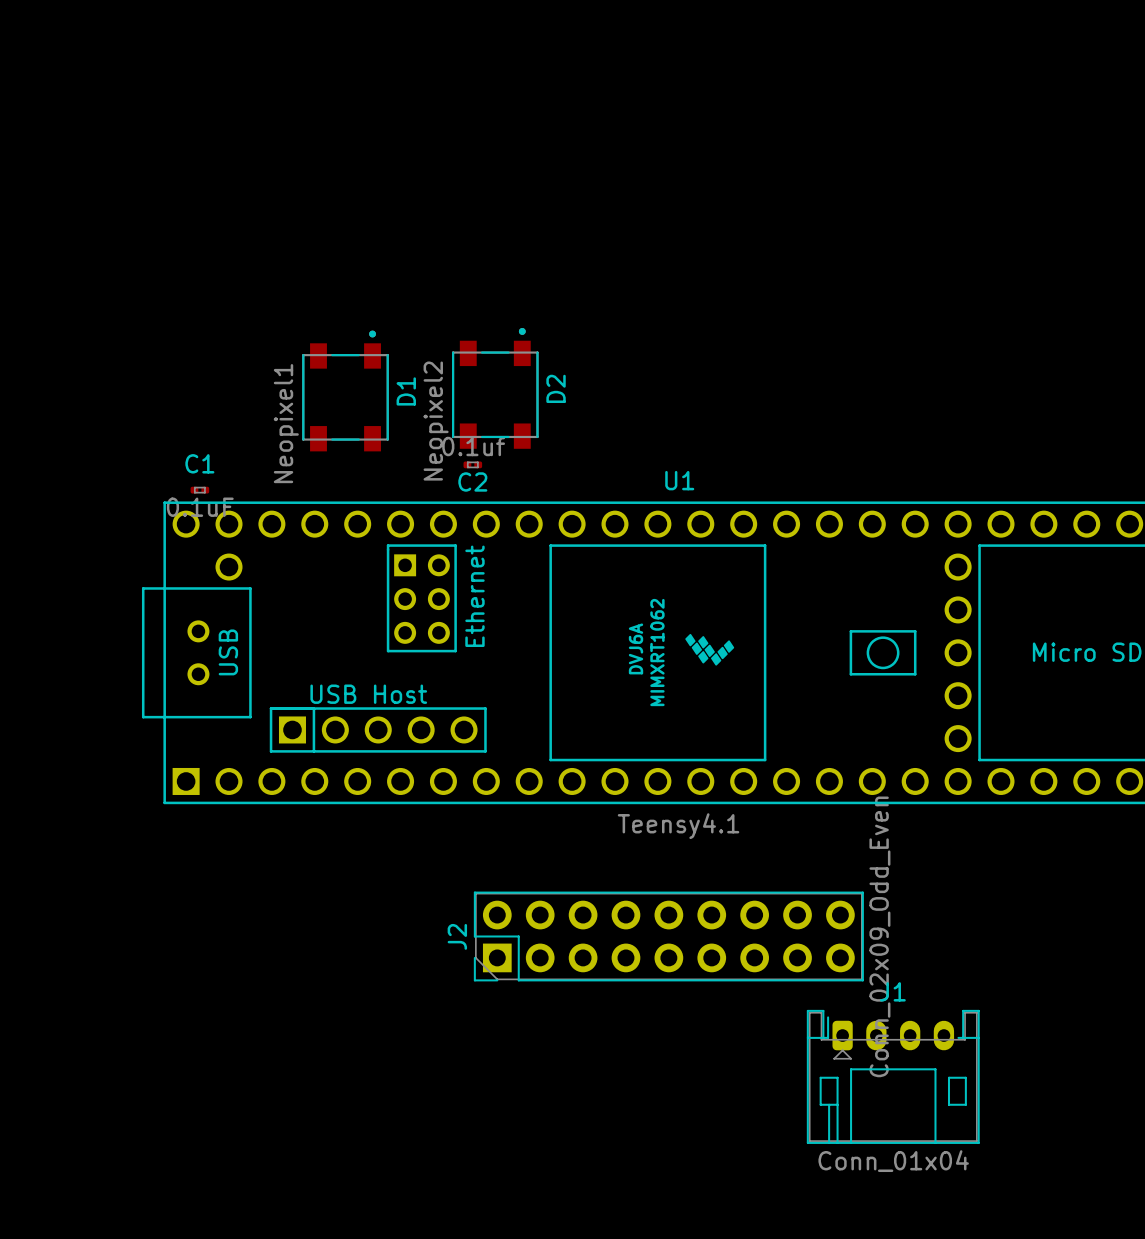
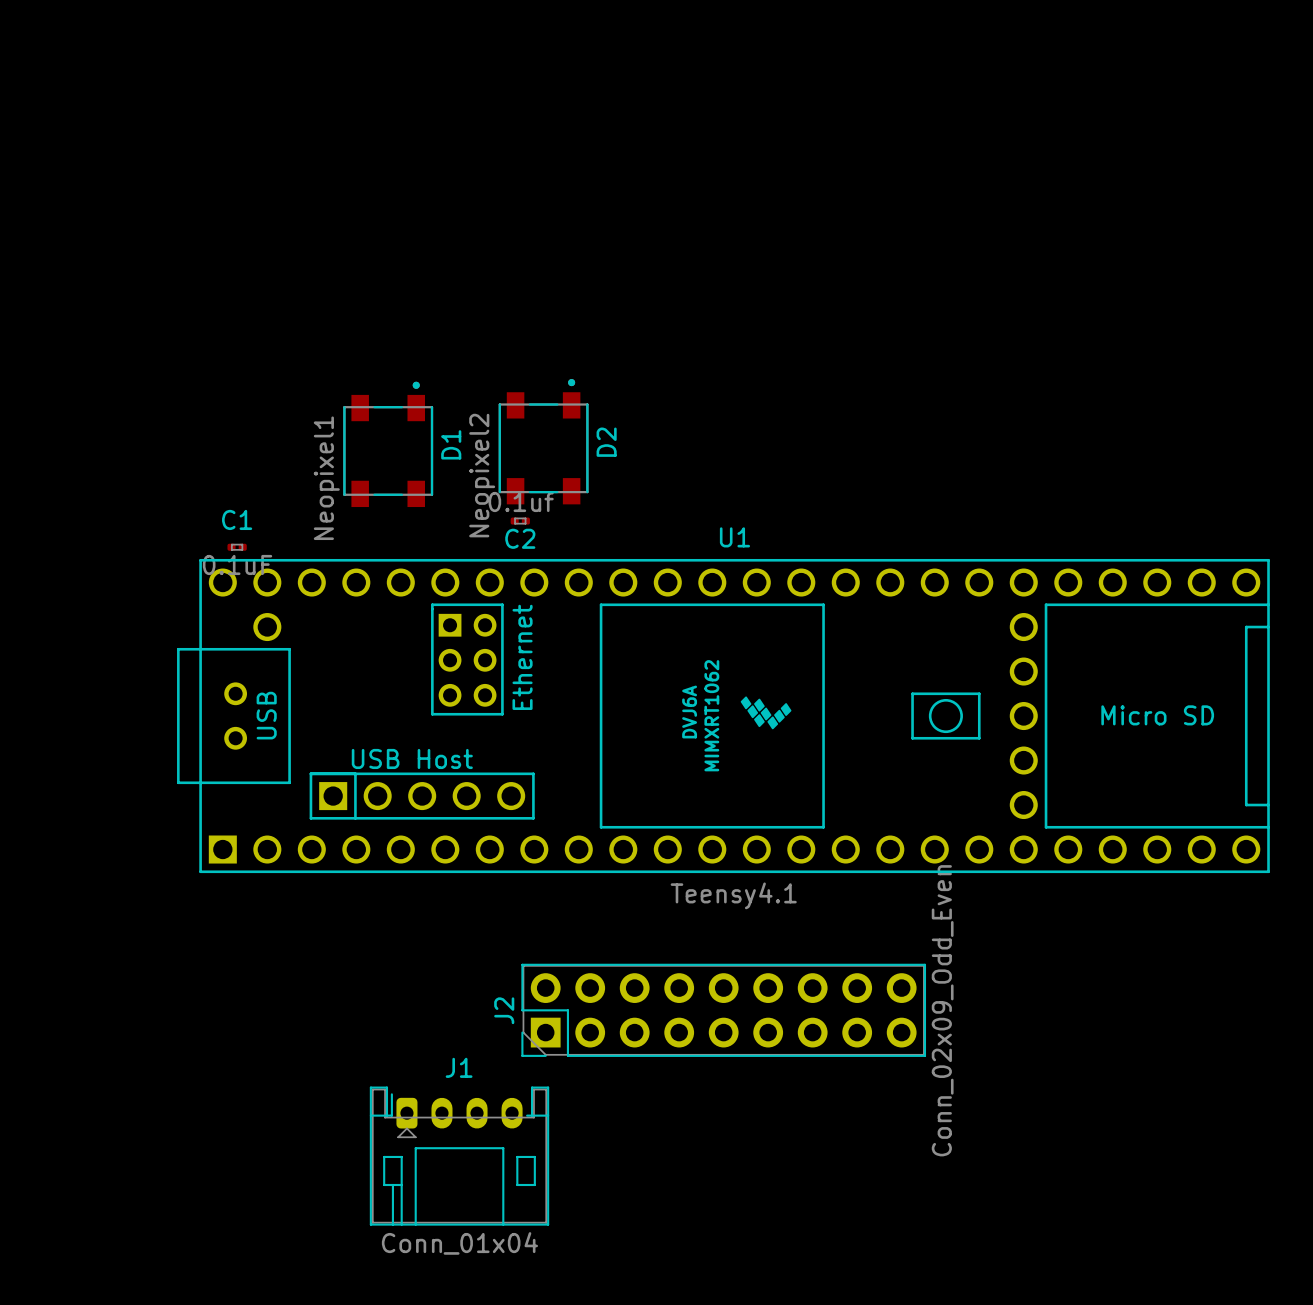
J1 position: (893, 1076) -> (459, 1156)

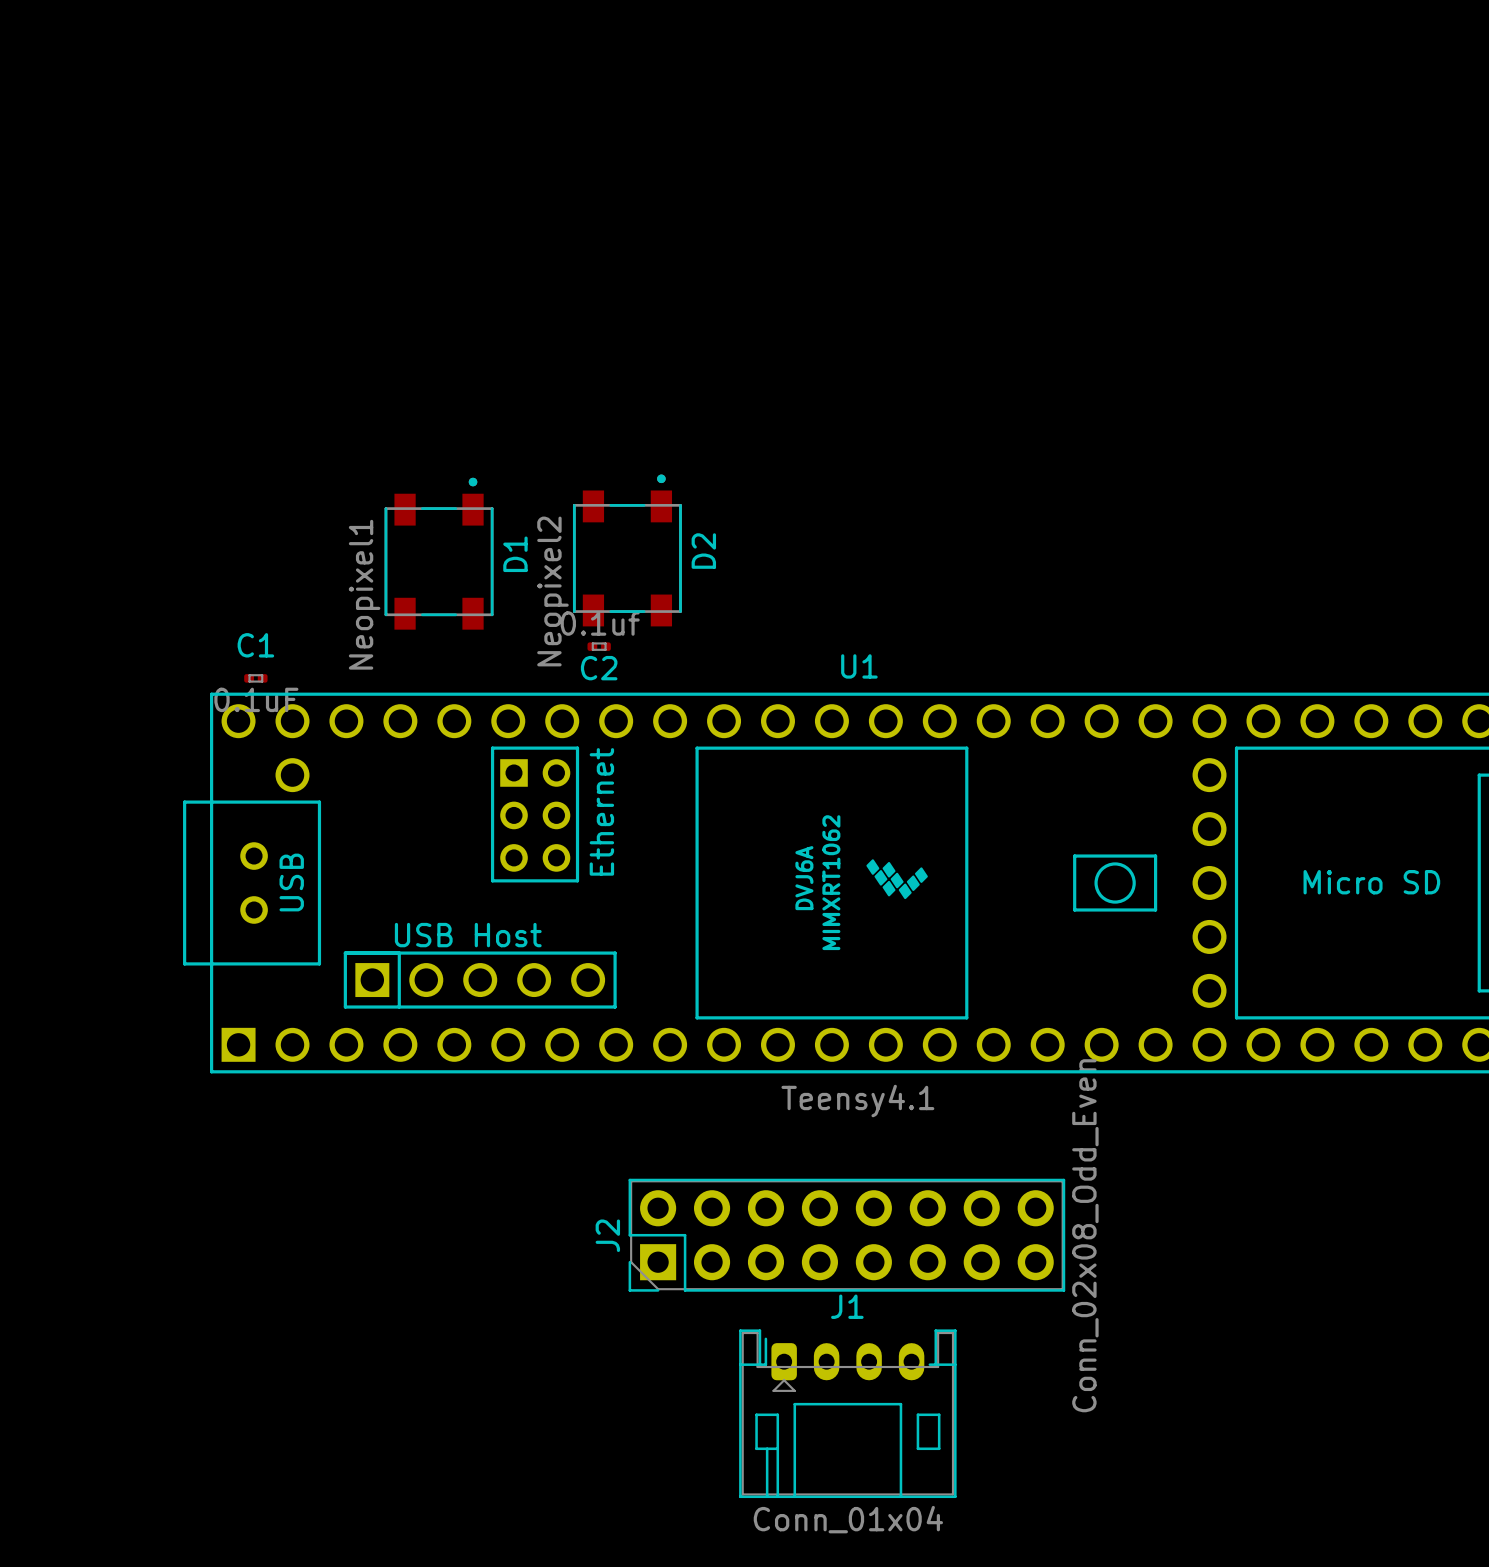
J2 footprint: [521, 963, 927, 1057] -> [628, 1178, 1066, 1292]
J2 value: Conn_02x09_Odd_Even (942, 1010) -> Conn_02x08_Odd_Even (1085, 1235)
J1 position: (459, 1156) -> (847, 1413)

